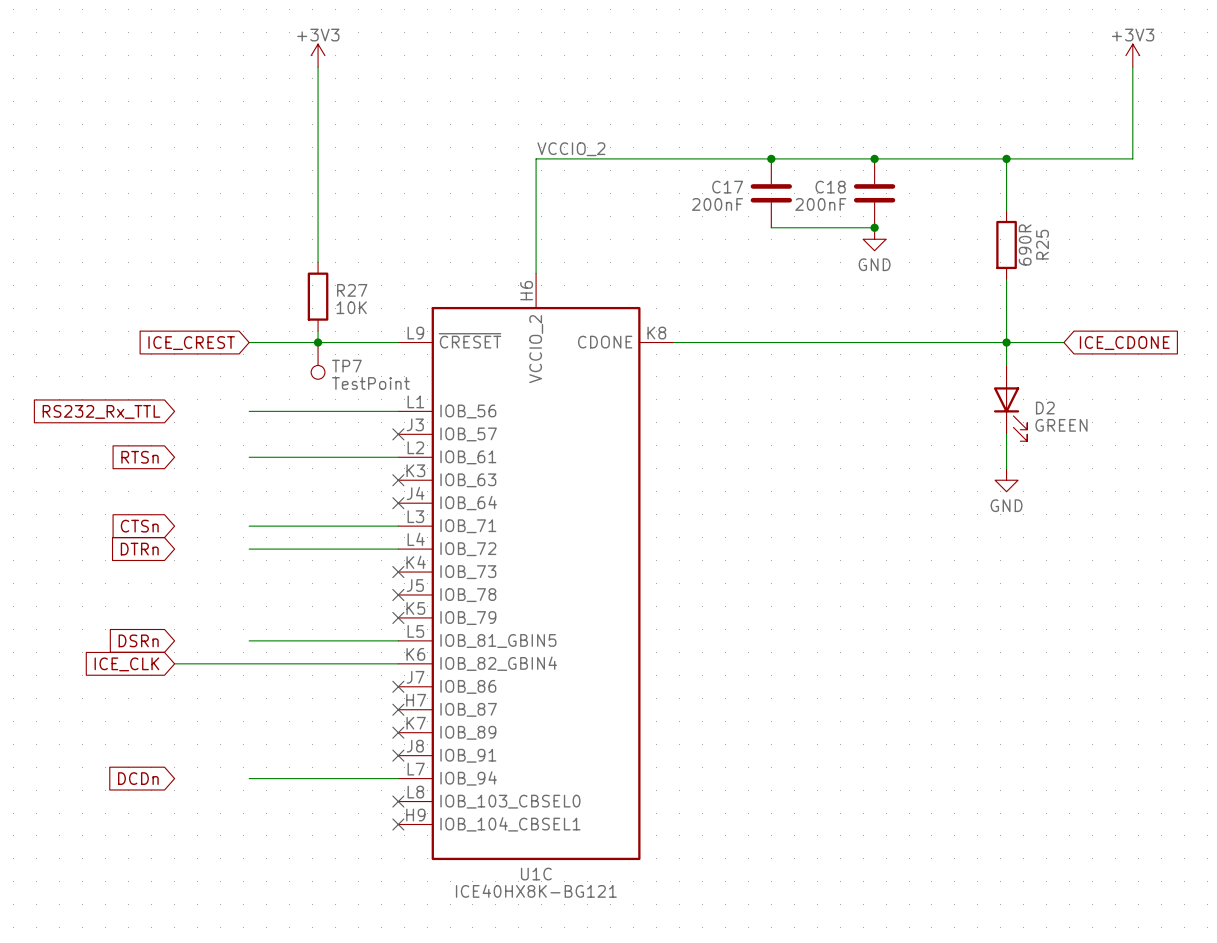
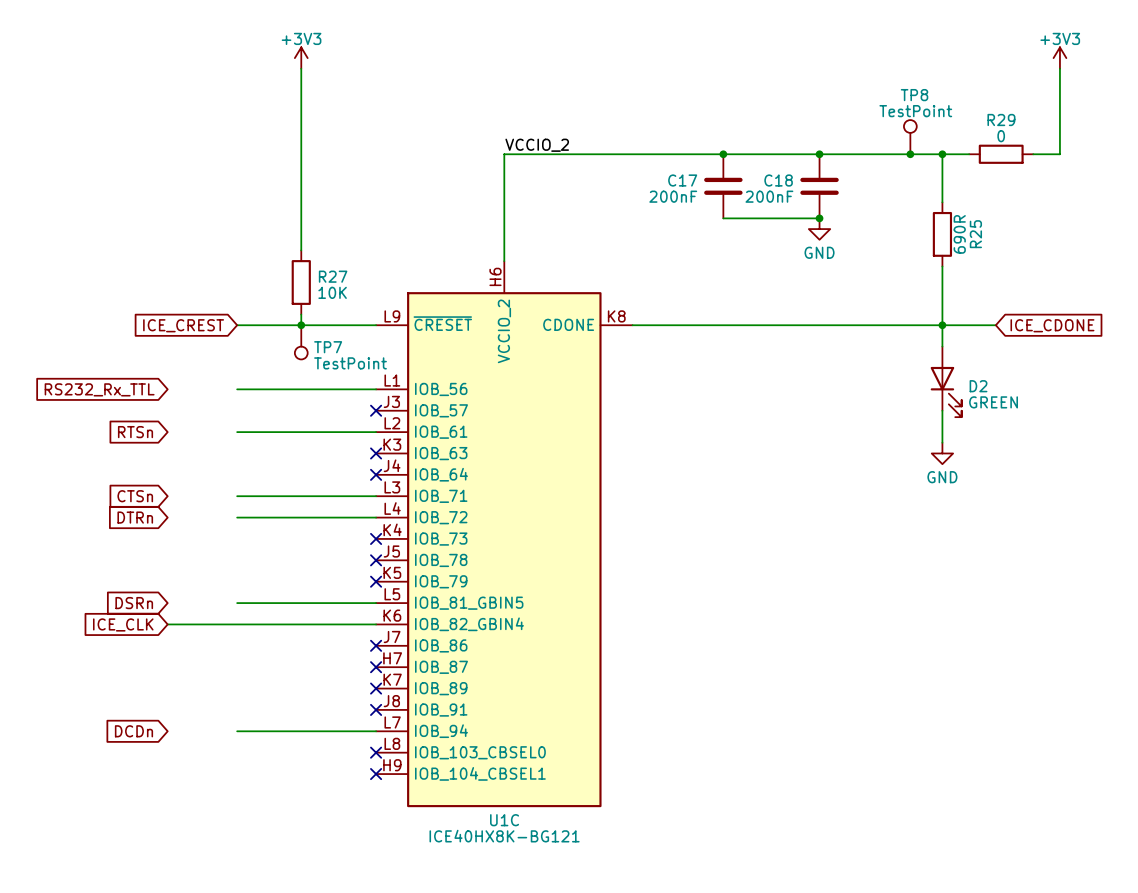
TP8: none -> TestPoint (910, 137)
junction: none -> (910, 154)
wire: (1035, 158) (1104, 158) -> none
R29: none -> 0 (1001, 154)

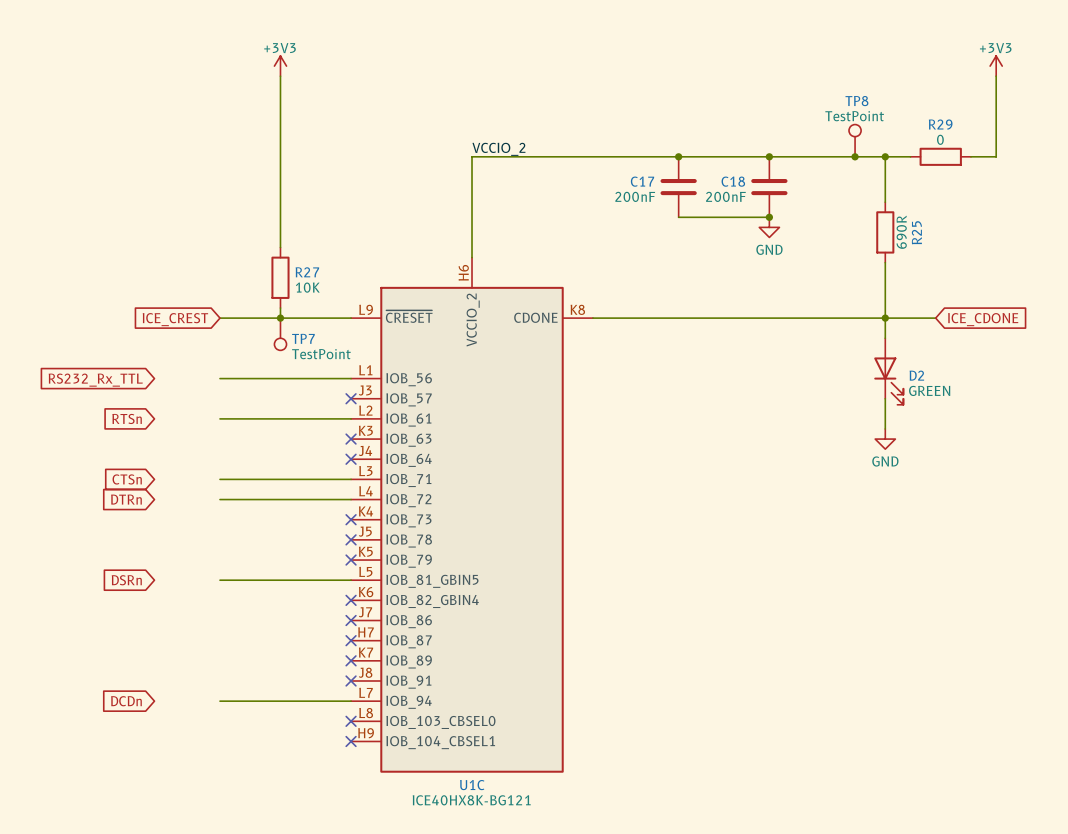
global label: ICE_CLK (123, 624) -> none
wire: (167, 624) (376, 624) -> none
no-connect mark: none -> (351, 600)

